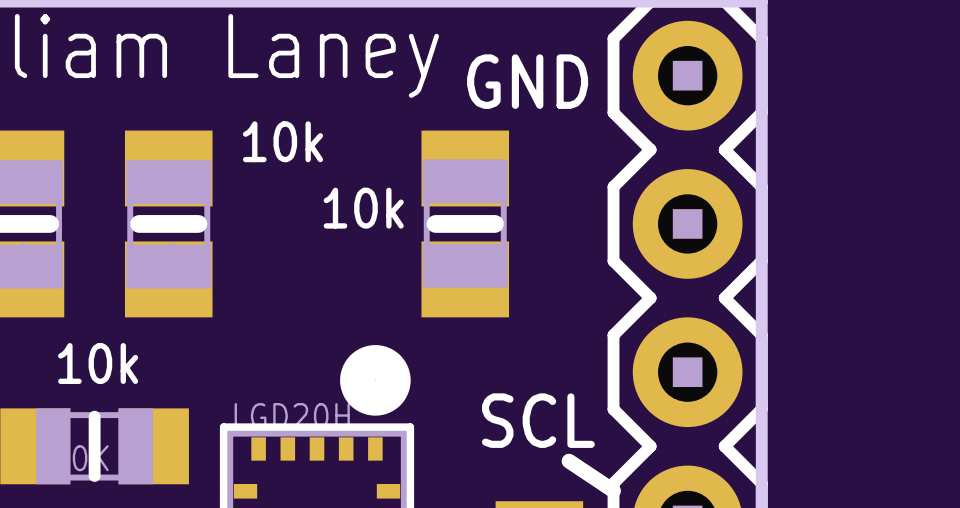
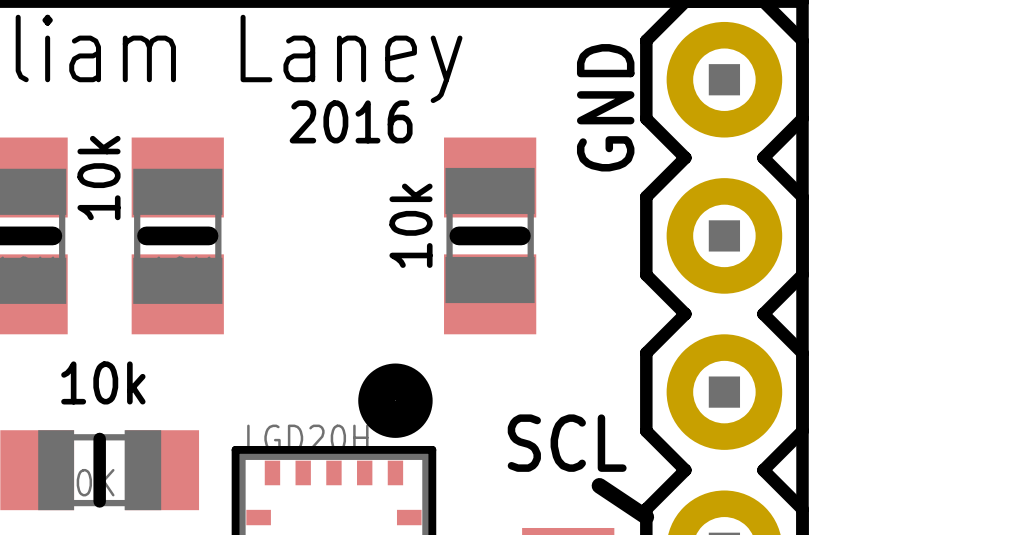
text rotation: 0° (527, 81) -> 90° counterclockwise (605, 107)
text: 10k (283, 141) -> 2016 (351, 121)
text: none -> 10k (99, 178)
text rotation: 0° (363, 208) -> 90° counterclockwise (411, 225)

